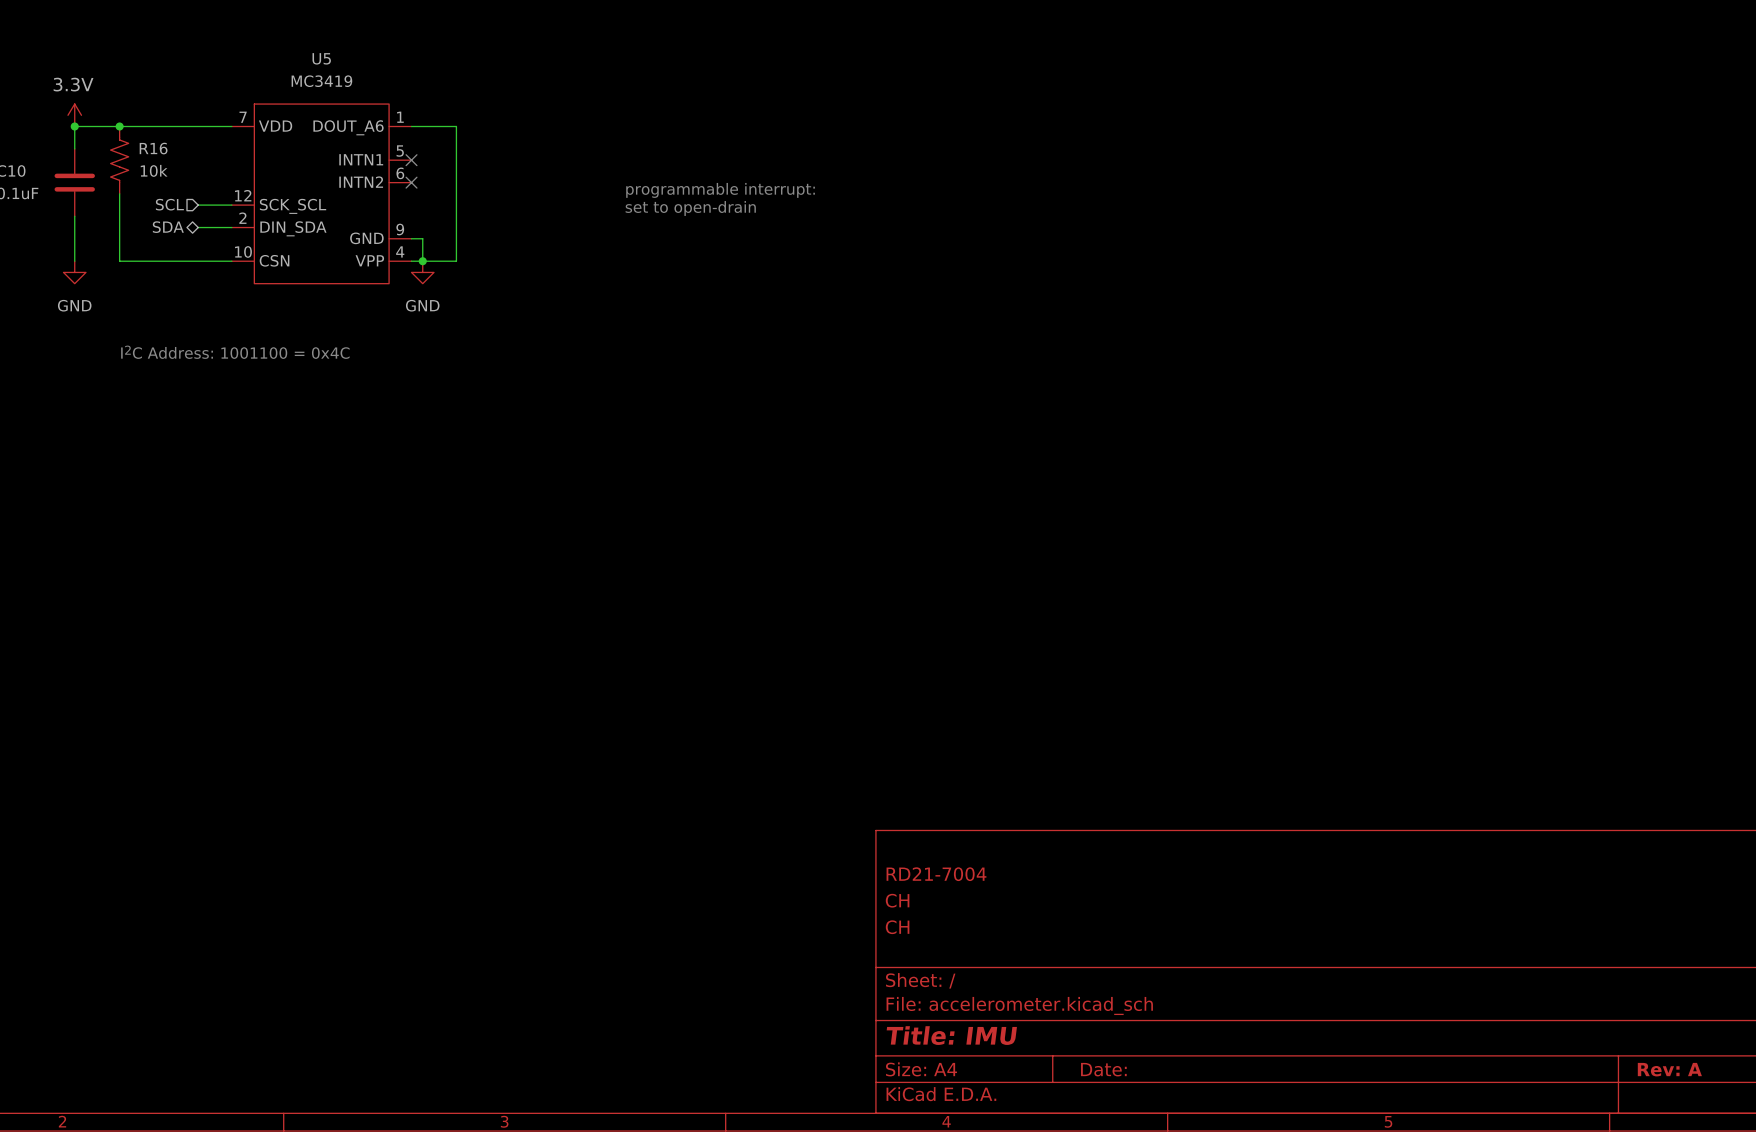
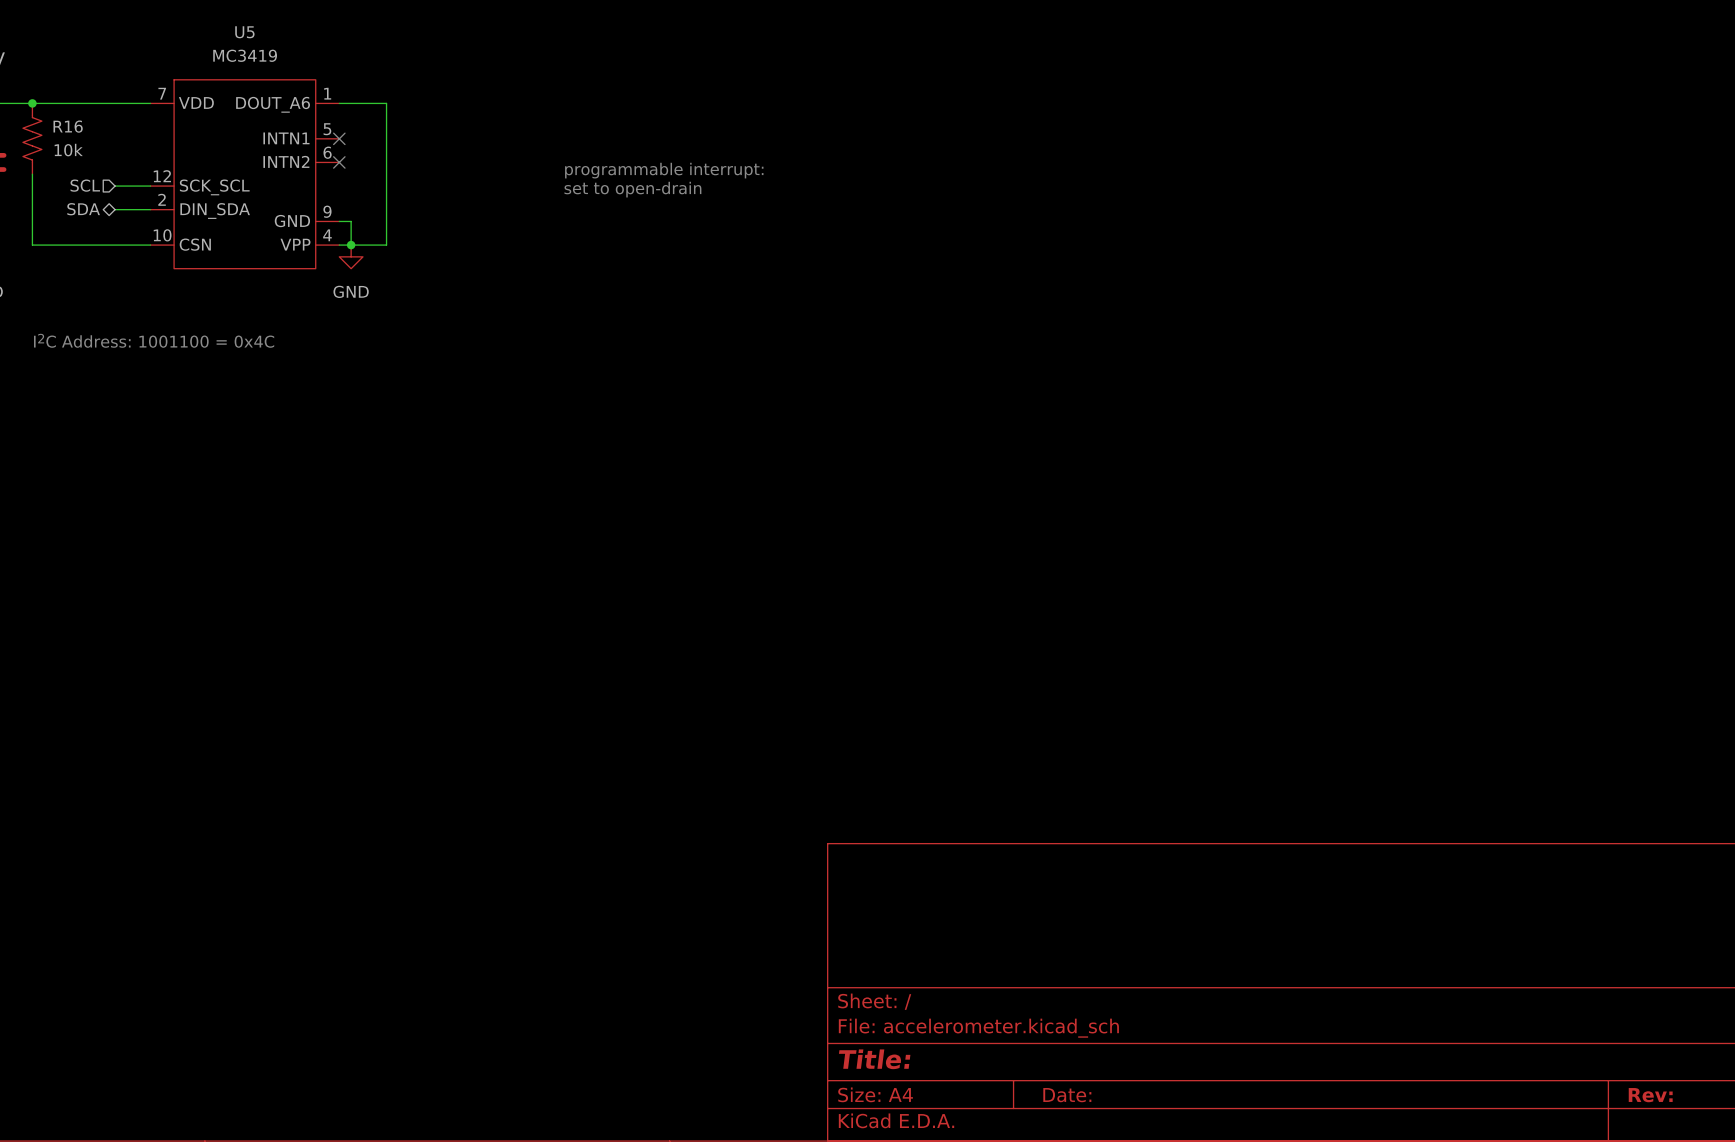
title block: RD21-7004 (936, 874) -> none
title block: CH (897, 900) -> none
title block: CH (897, 927) -> none
title block: Title: IMU (951, 1035) -> Title: (874, 1059)
title block: Rev: A (1669, 1069) -> Rev: (1650, 1095)

